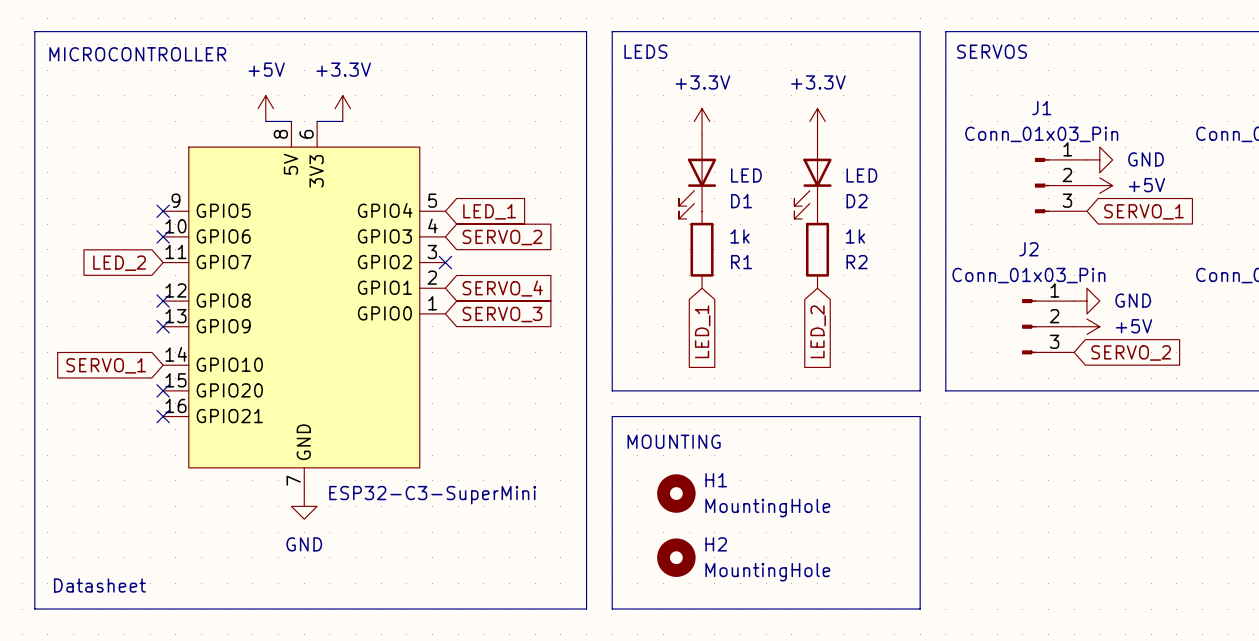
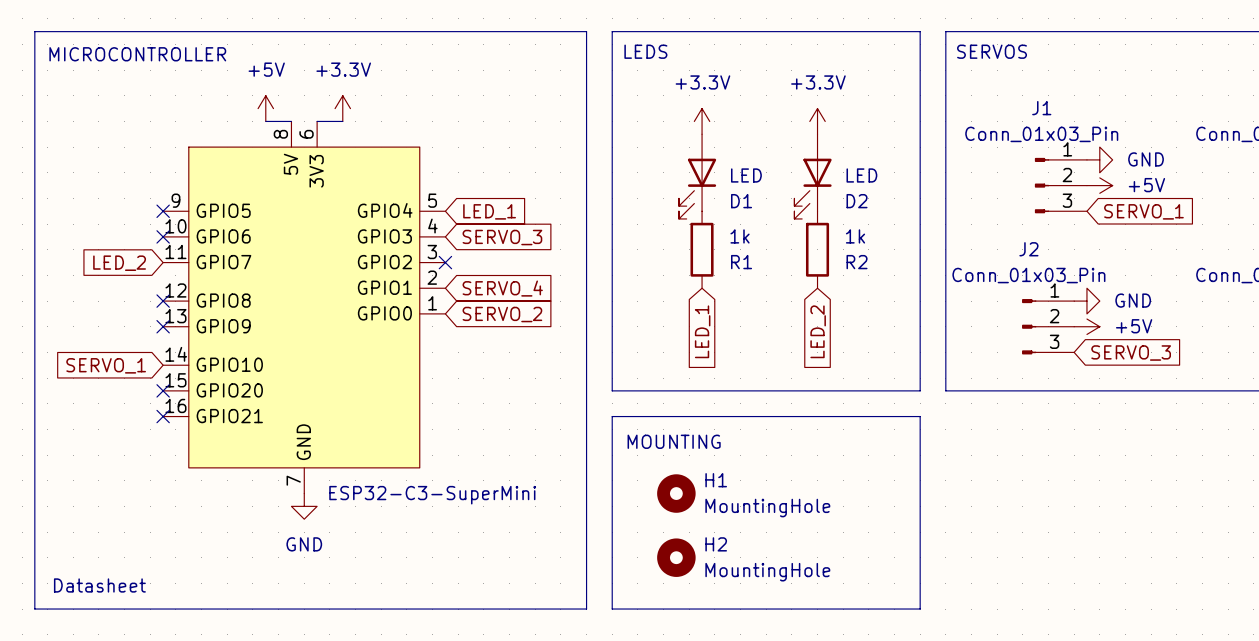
global label: SERVO_2 (502, 237) -> SERVO_3 (502, 237)
global label: SERVO_3 (502, 314) -> SERVO_2 (502, 314)
global label: SERVO_2 (1131, 353) -> SERVO_3 (1131, 353)

